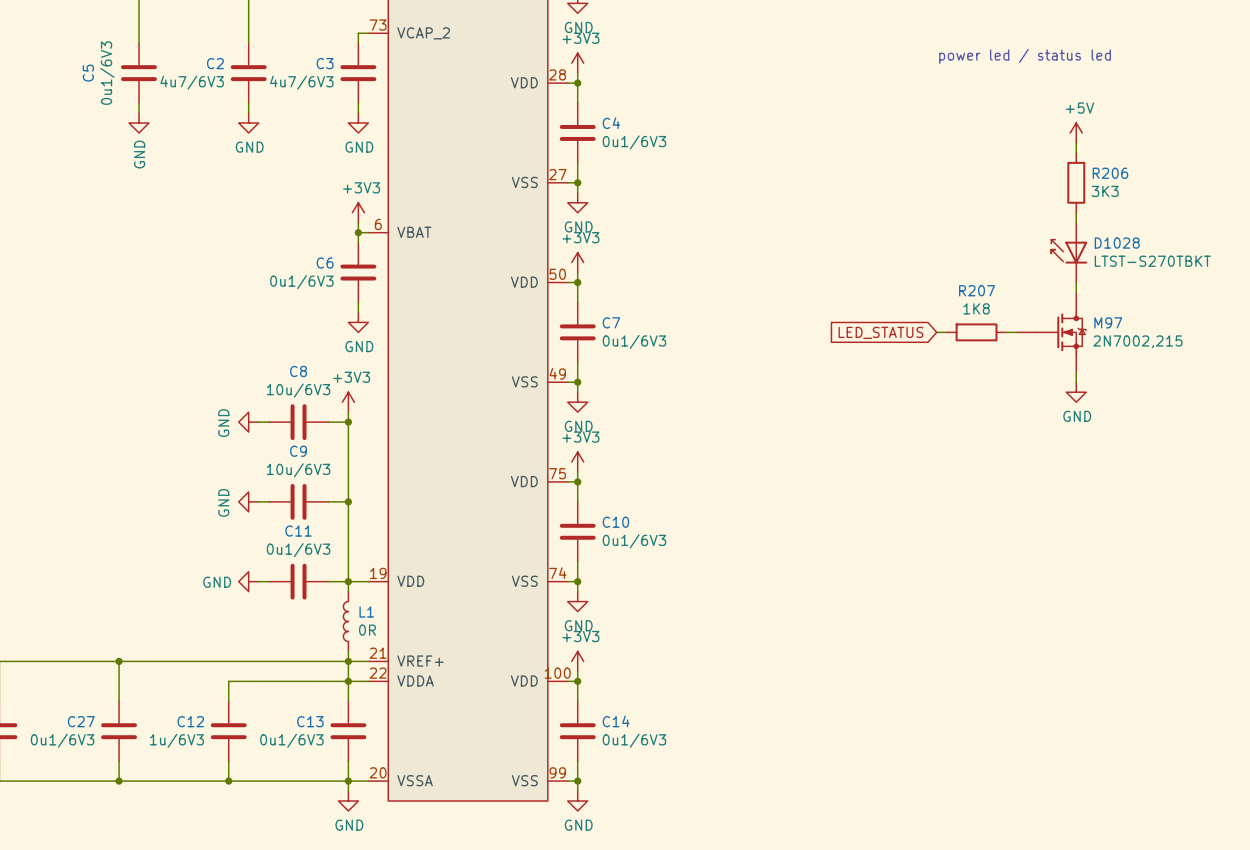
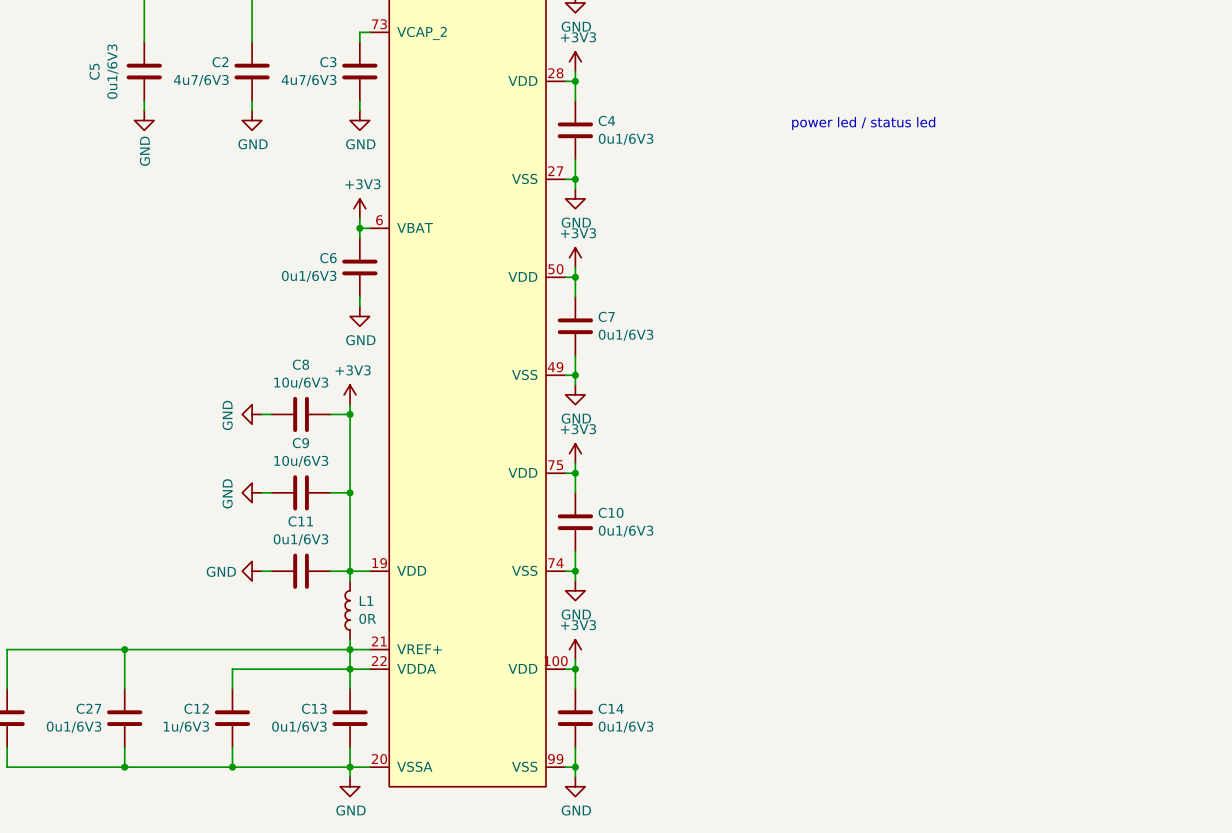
text position: power led / status led (1025, 56) -> power led / status led (863, 123)
power symbol: +5V (1076, 132) -> none
wire: (1076, 142) (1076, 152) -> none
R206: 3K3 (1076, 182) -> none
wire: (1076, 212) (1076, 222) -> none
D1028: LTST-S270TBKT (1069, 252) -> none
wire: (1076, 282) (1076, 292) -> none
global label: LED_STATUS (880, 332) -> none
wire: (936, 332) (946, 332) -> none
R207: 1K8 (976, 332) -> none
wire: (1006, 332) (1016, 332) -> none
M97: 2N7002,215 (1051, 332) -> none
wire: (1076, 372) (1076, 382) -> none
power symbol: GND (1076, 392) -> none

